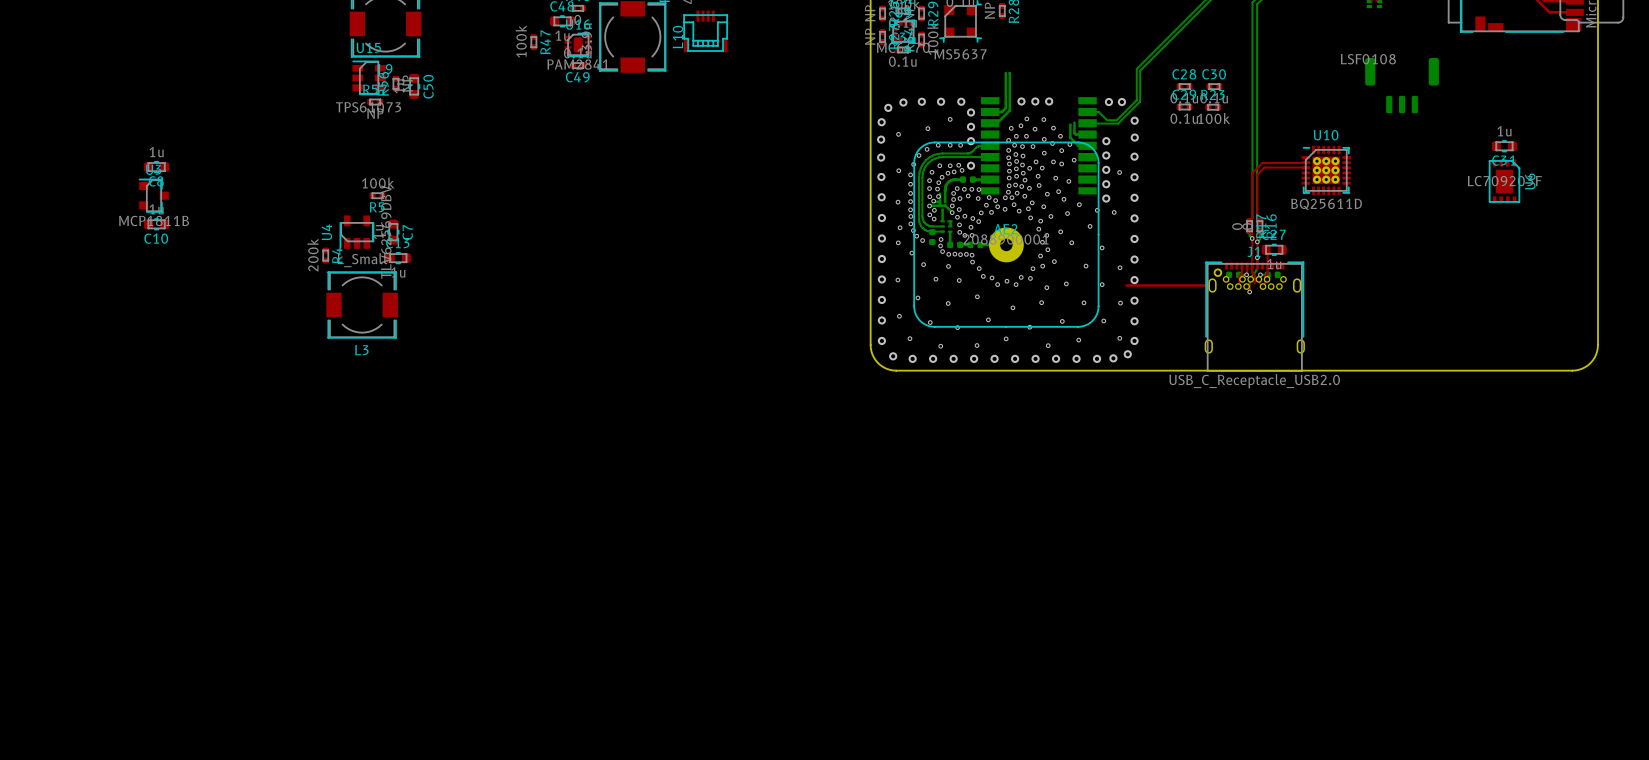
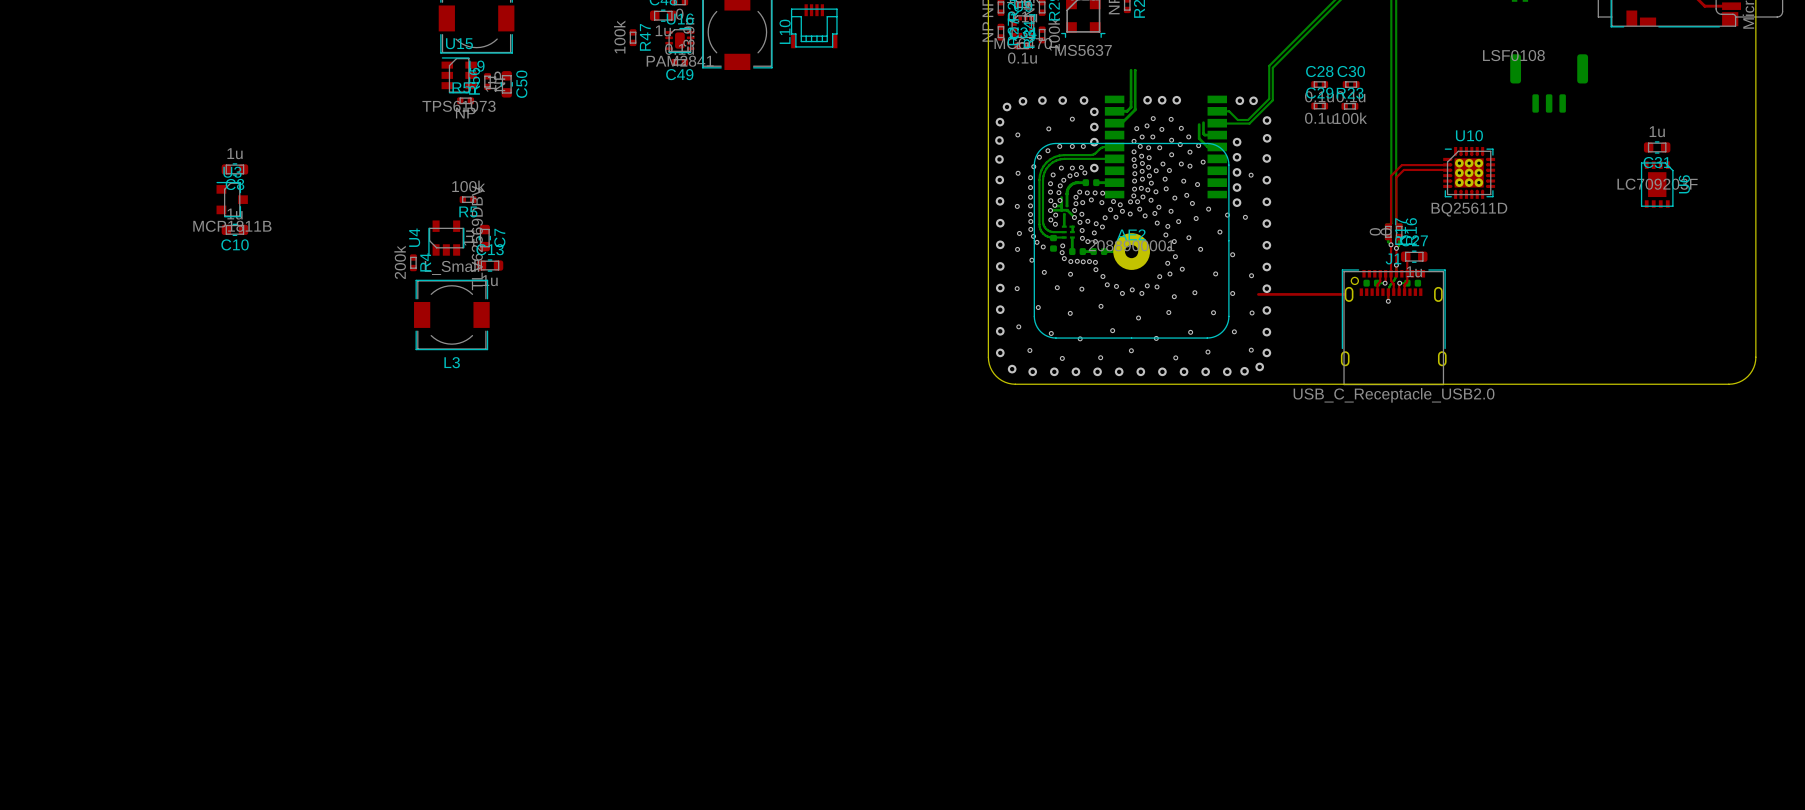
J1 footprint: [1204, 261, 1305, 372] -> [1340, 269, 1447, 386]

